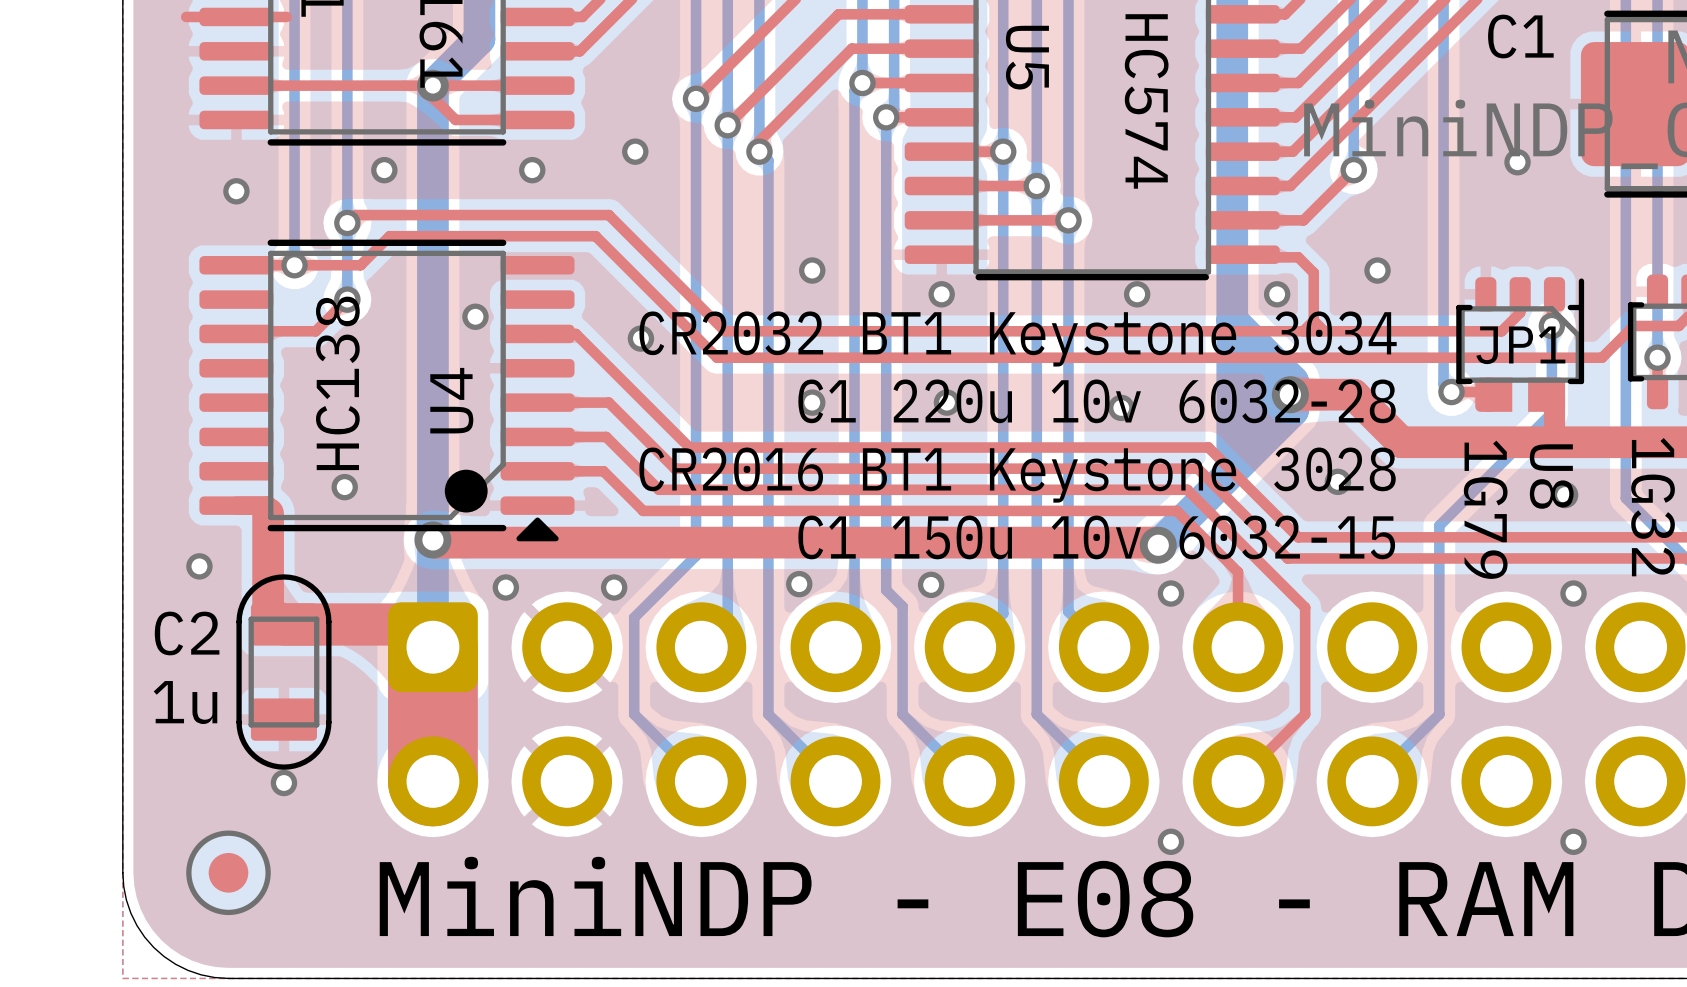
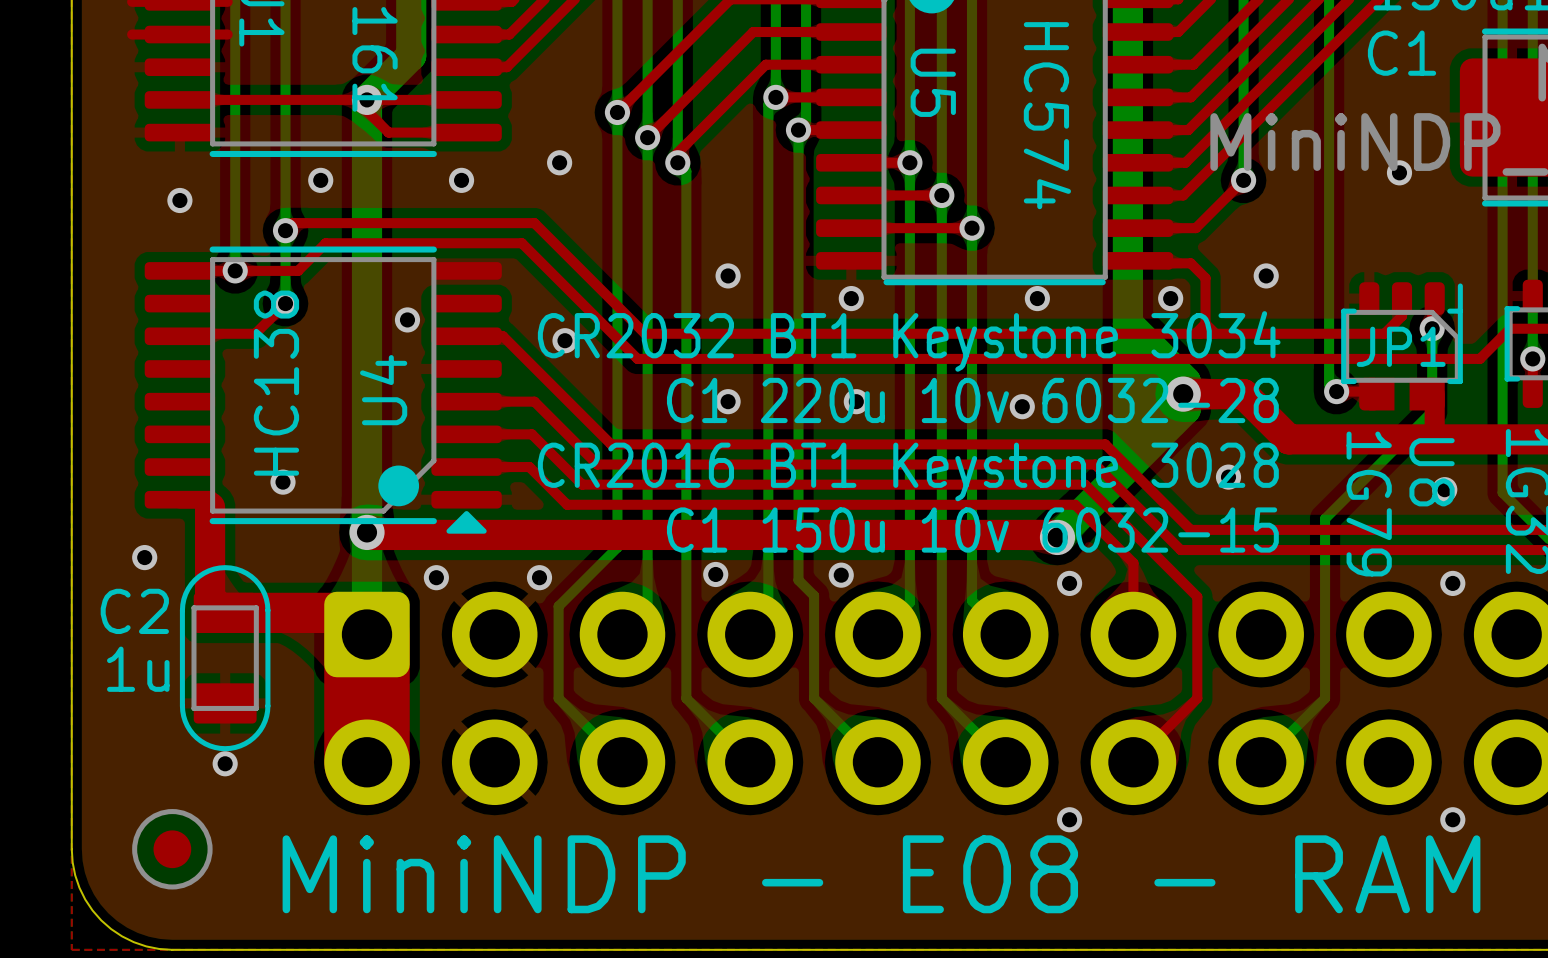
C2 name position: C2 (187, 633) -> C2 (134, 611)
C2 value position: 1u (185, 702) -> 1u (138, 669)

